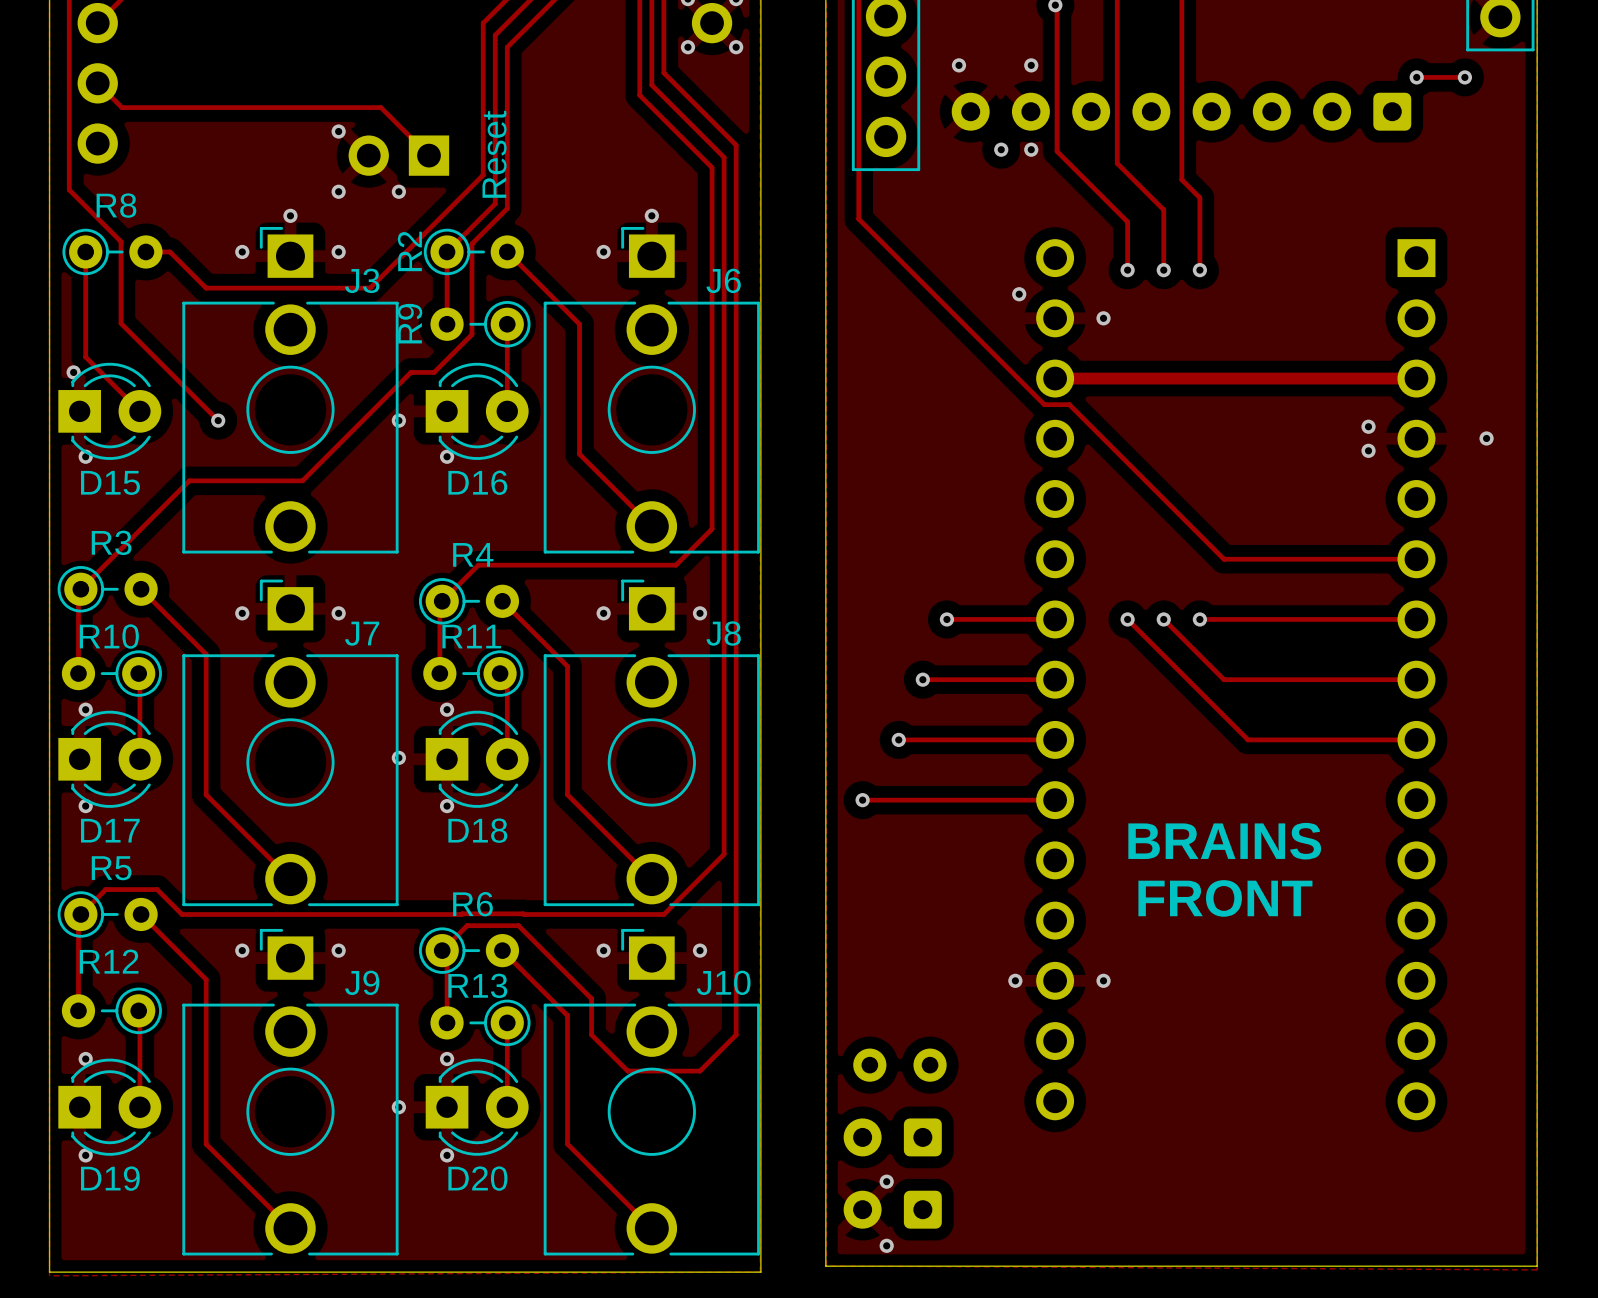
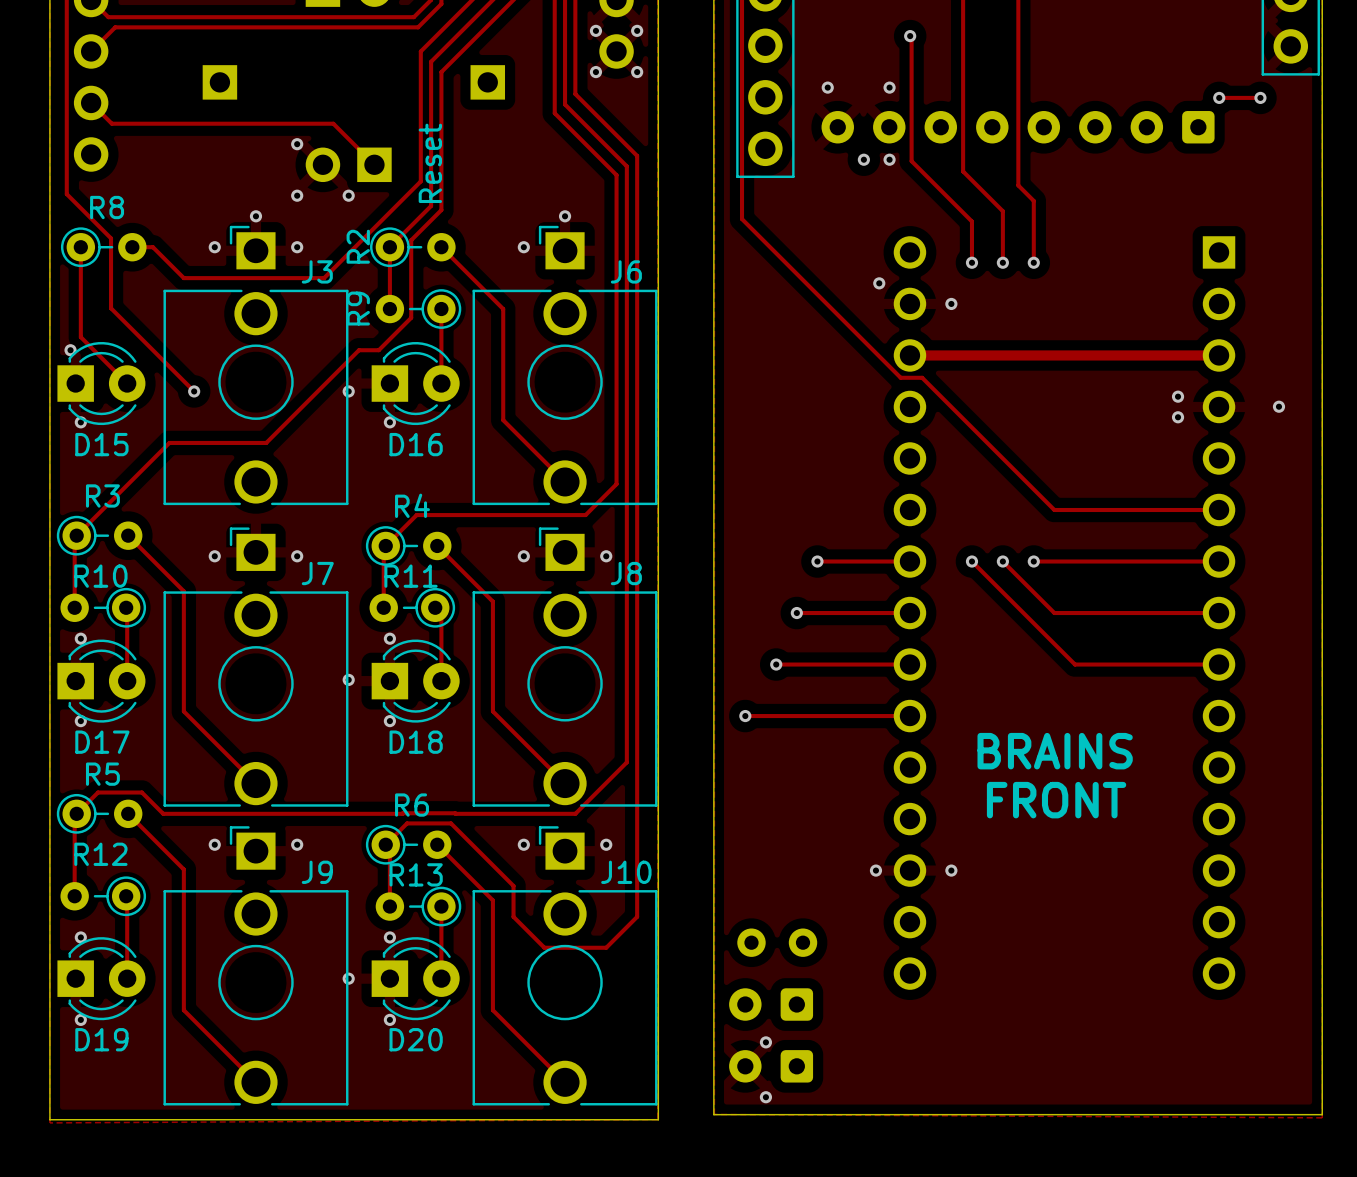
part: none -> (219, 82)
part: none -> (487, 82)

